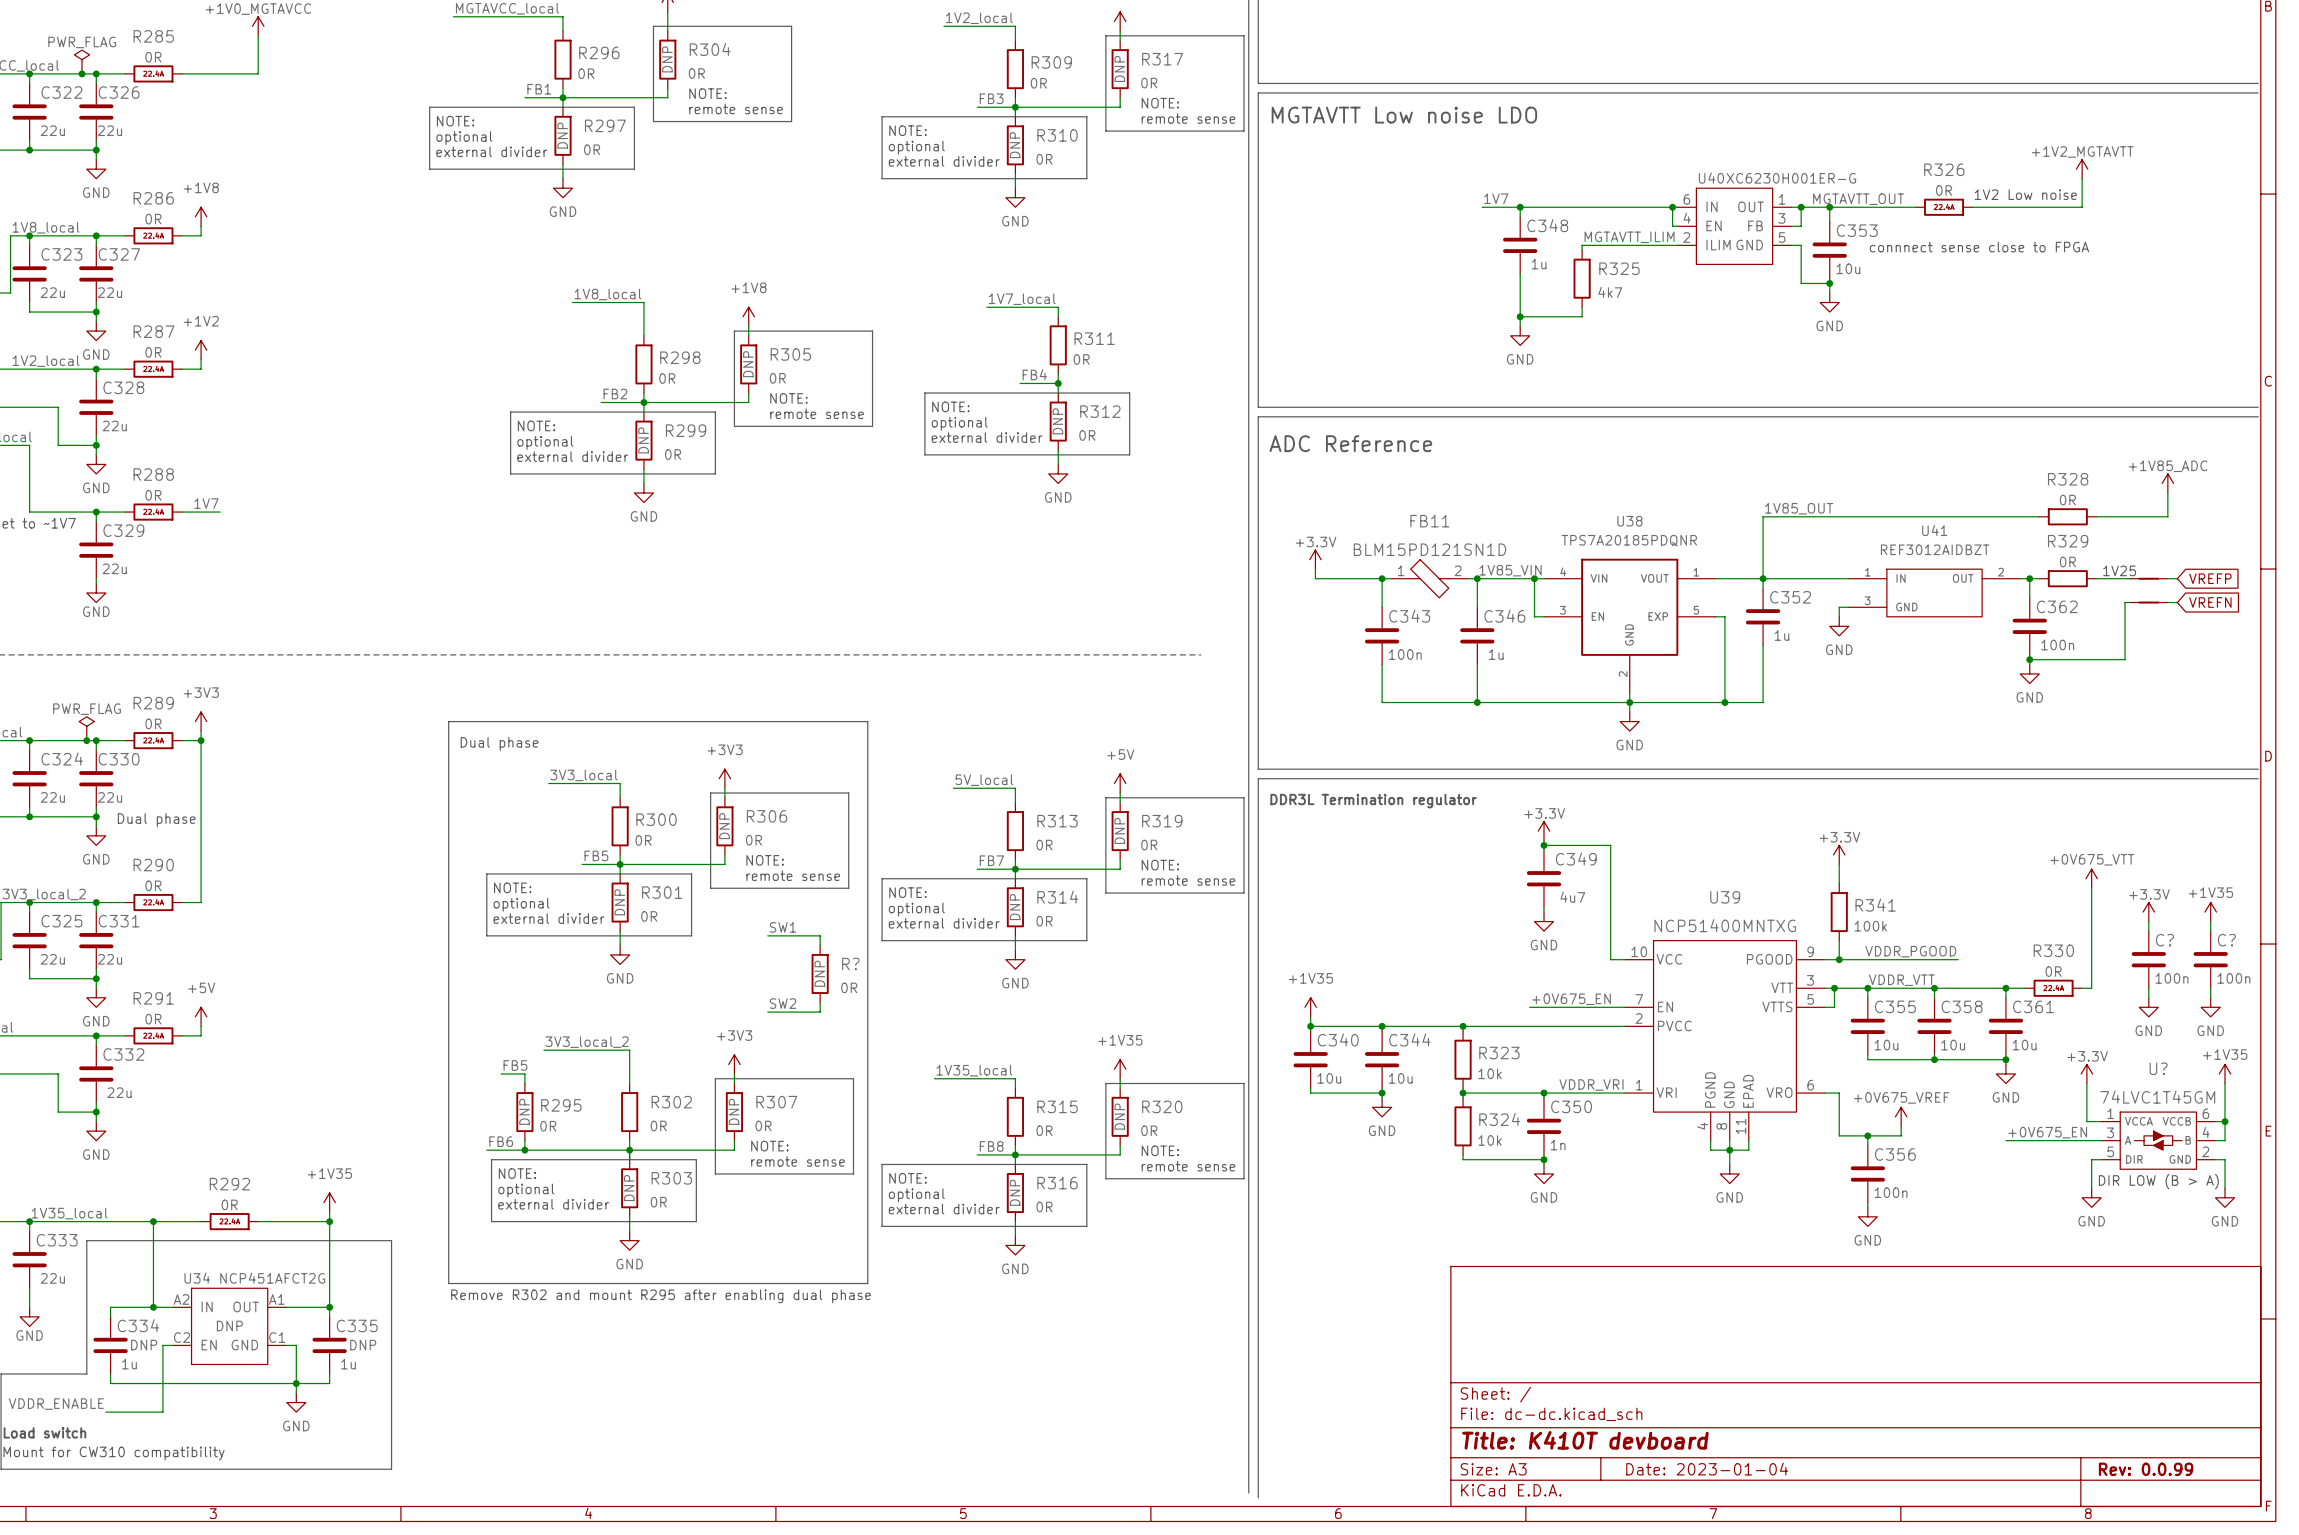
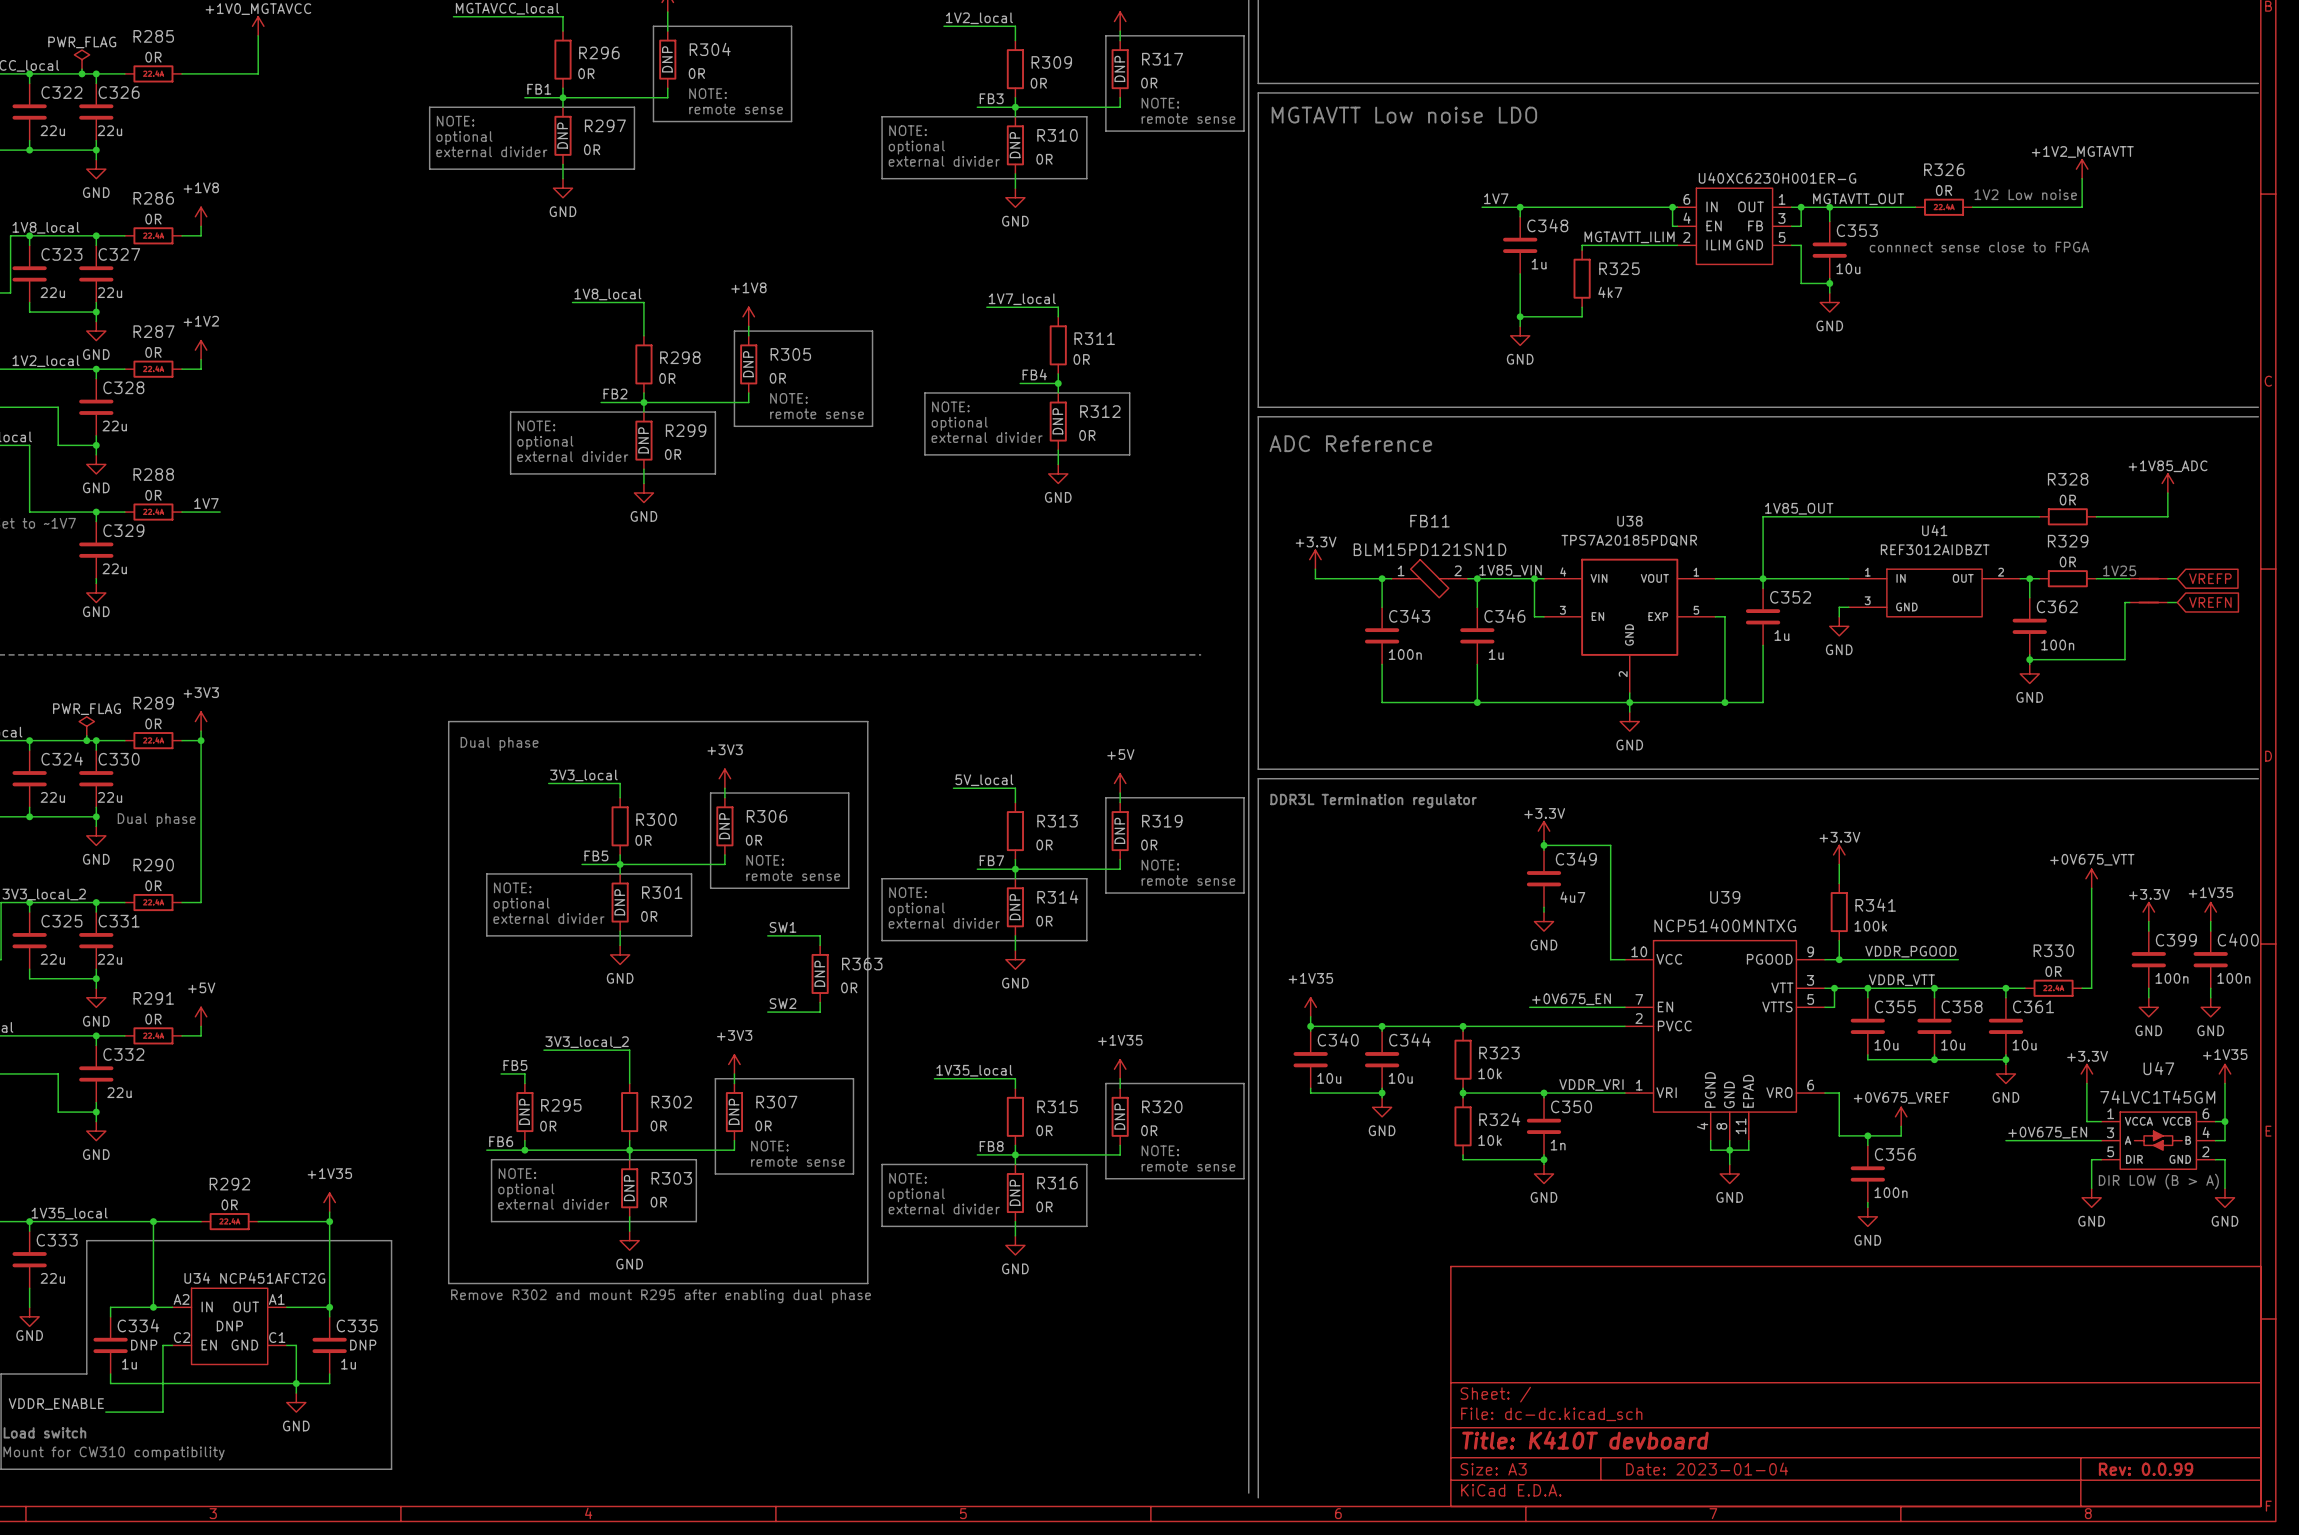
C? name: C? (2164, 940) -> C399 (2176, 940)
C? name: C? (2226, 940) -> C400 (2238, 939)
R? name: R? (850, 964) -> R363 (862, 964)
U? name: U? (2158, 1068) -> U47 (2158, 1068)

